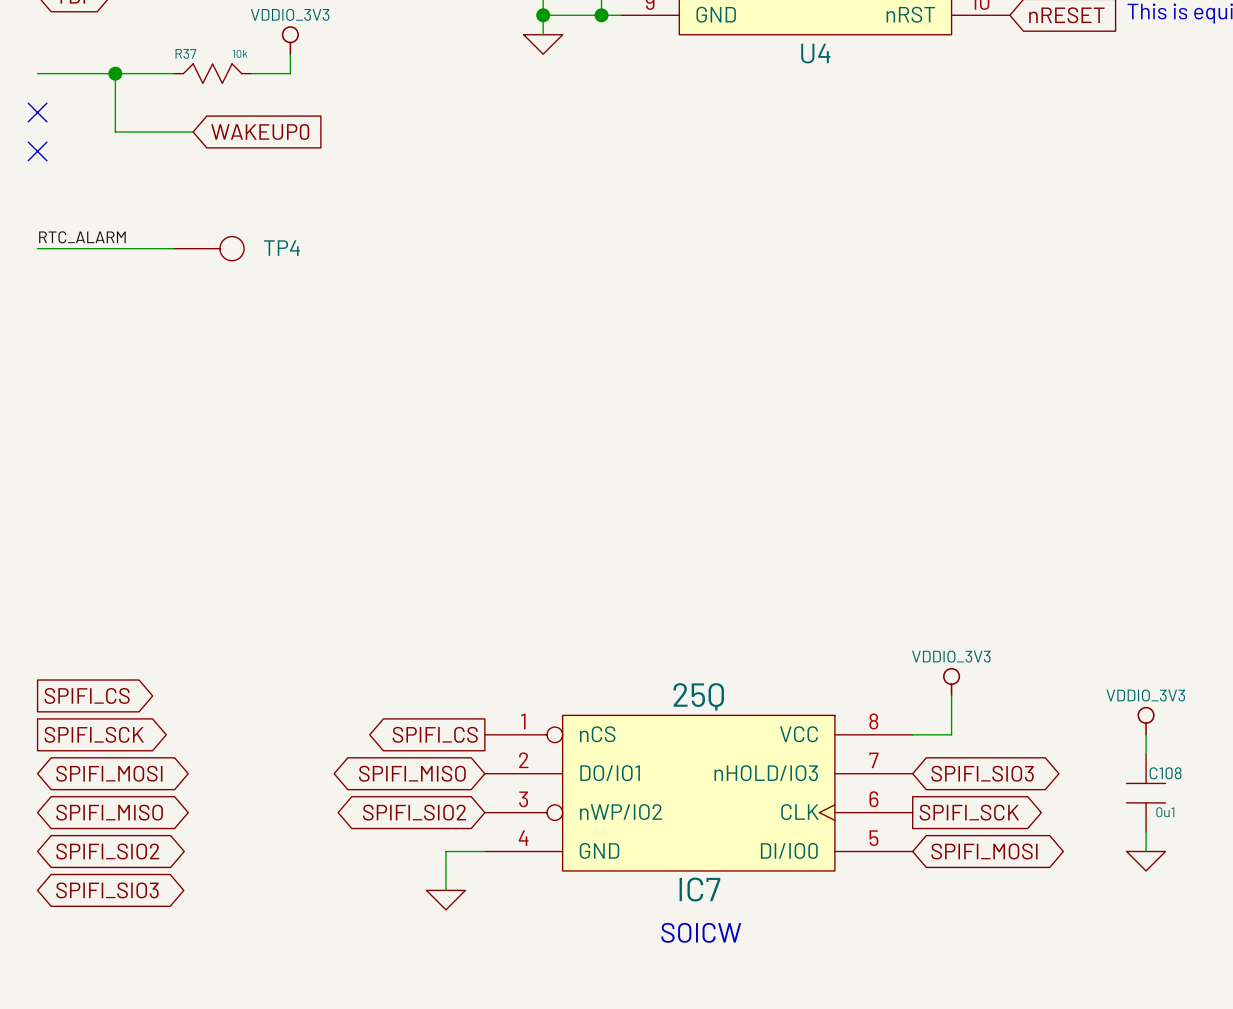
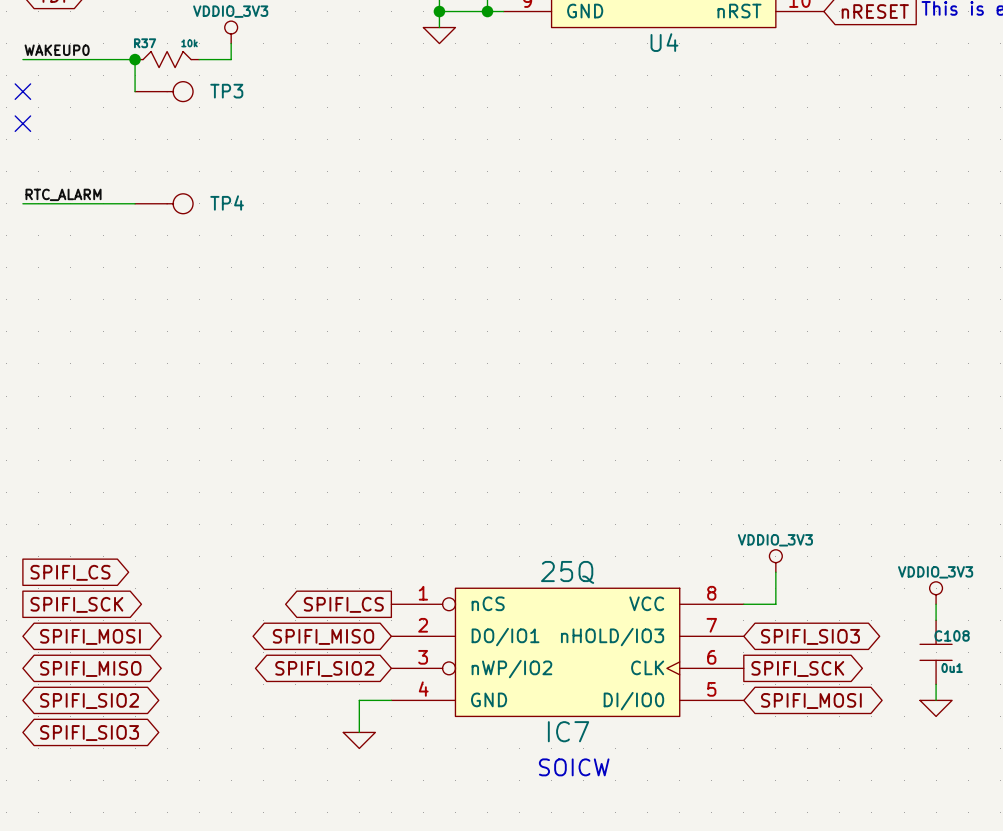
label: none -> WAKEUP0 (57, 50)
wire: (115, 73) (115, 131) (193, 131) -> none
junction position: (115, 73) -> (135, 59)
wire: none -> (135, 59) (135, 91)
TP3: none -> (164, 91)
global label: WAKEUP0 (260, 131) -> none

